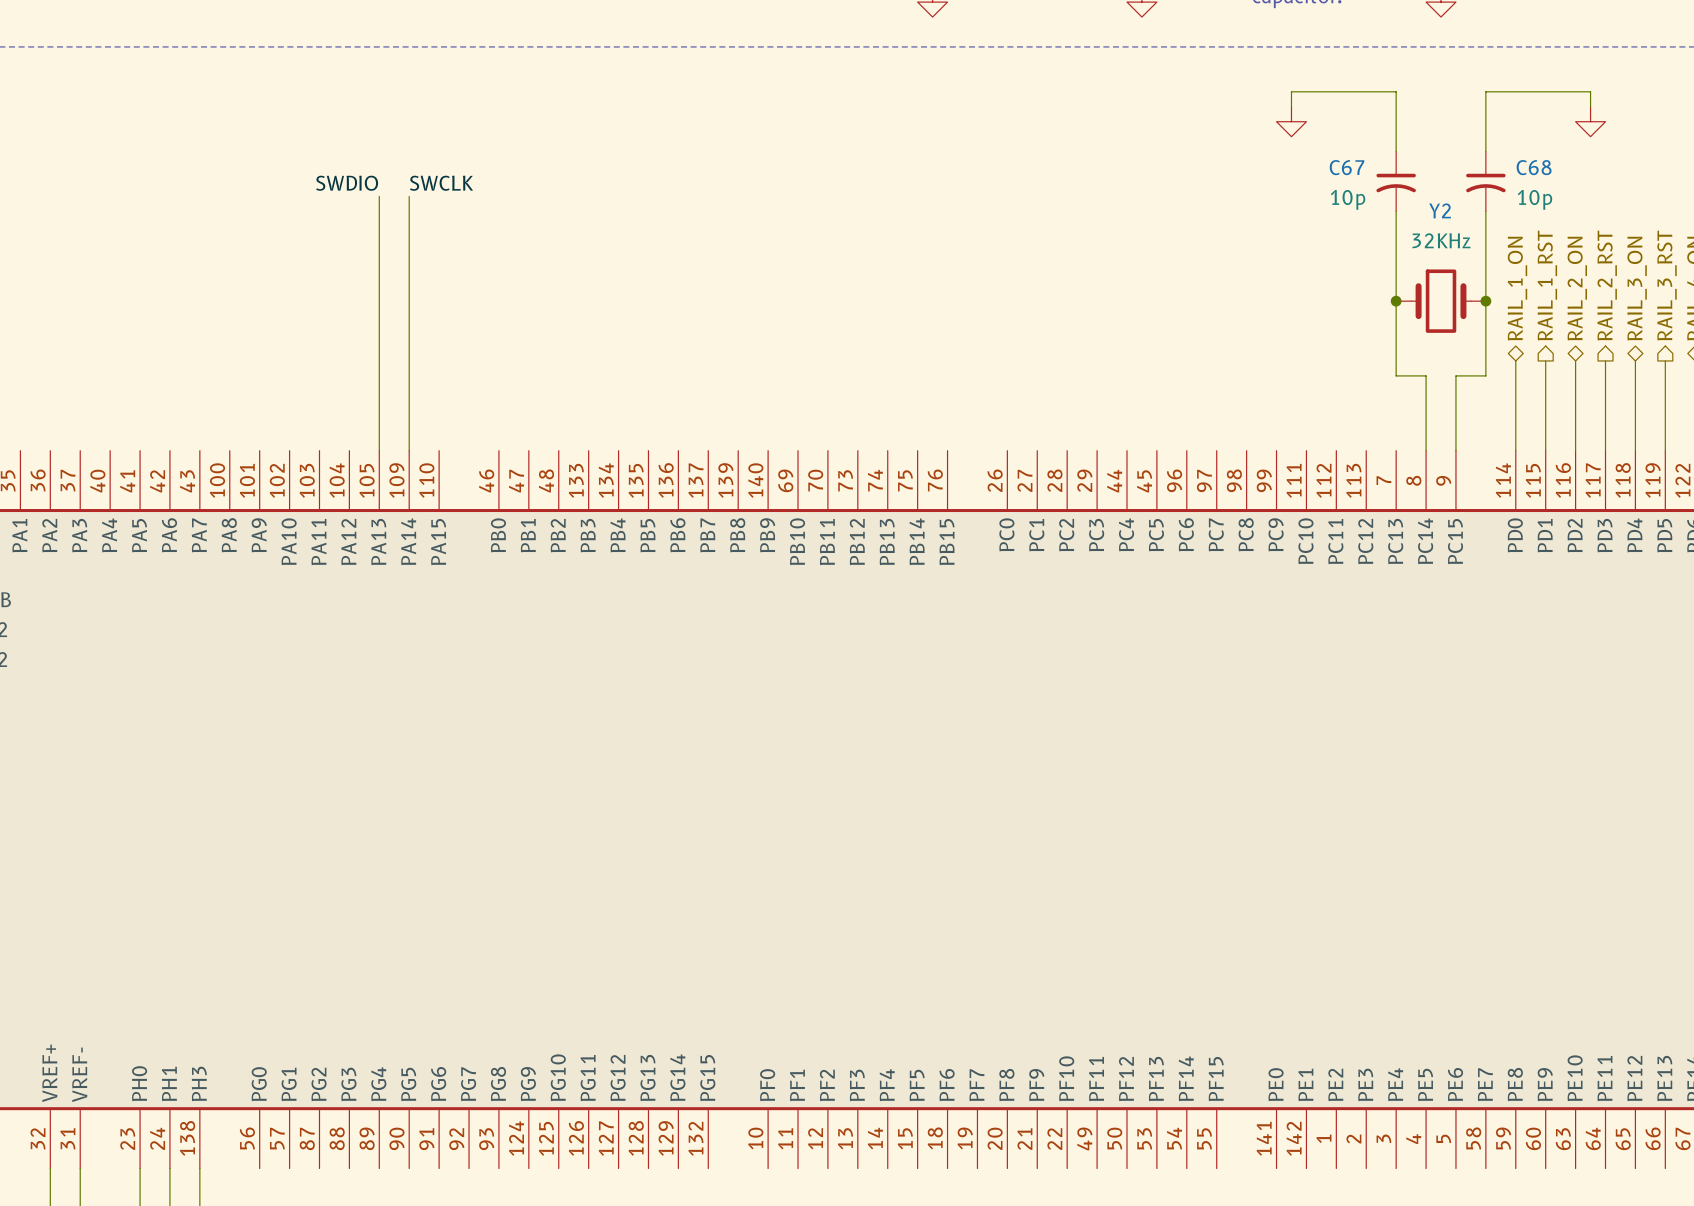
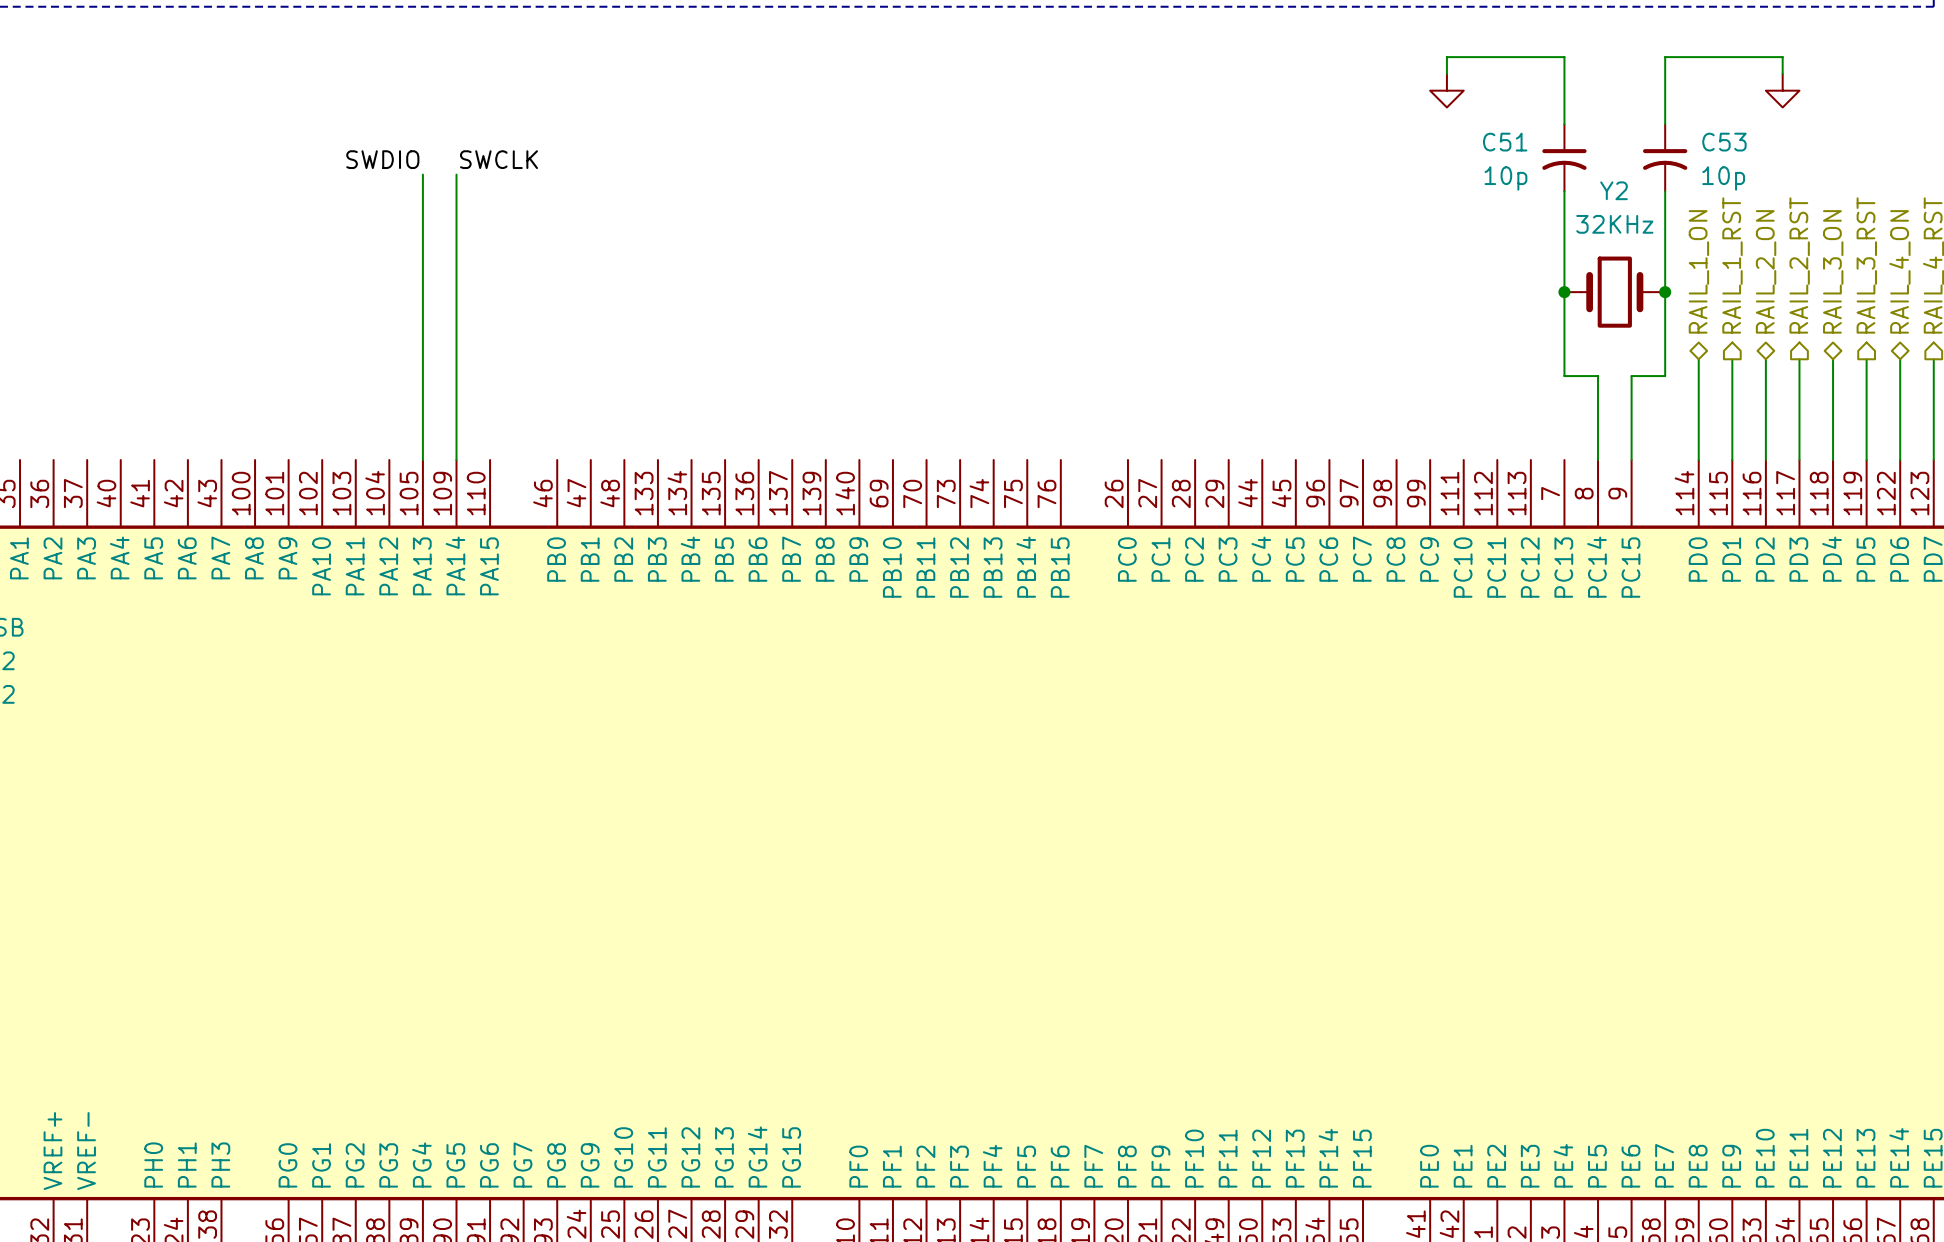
C67 name: C67 (1347, 167) -> C51 (1505, 142)
C68 name: C68 (1534, 167) -> C53 (1724, 142)

